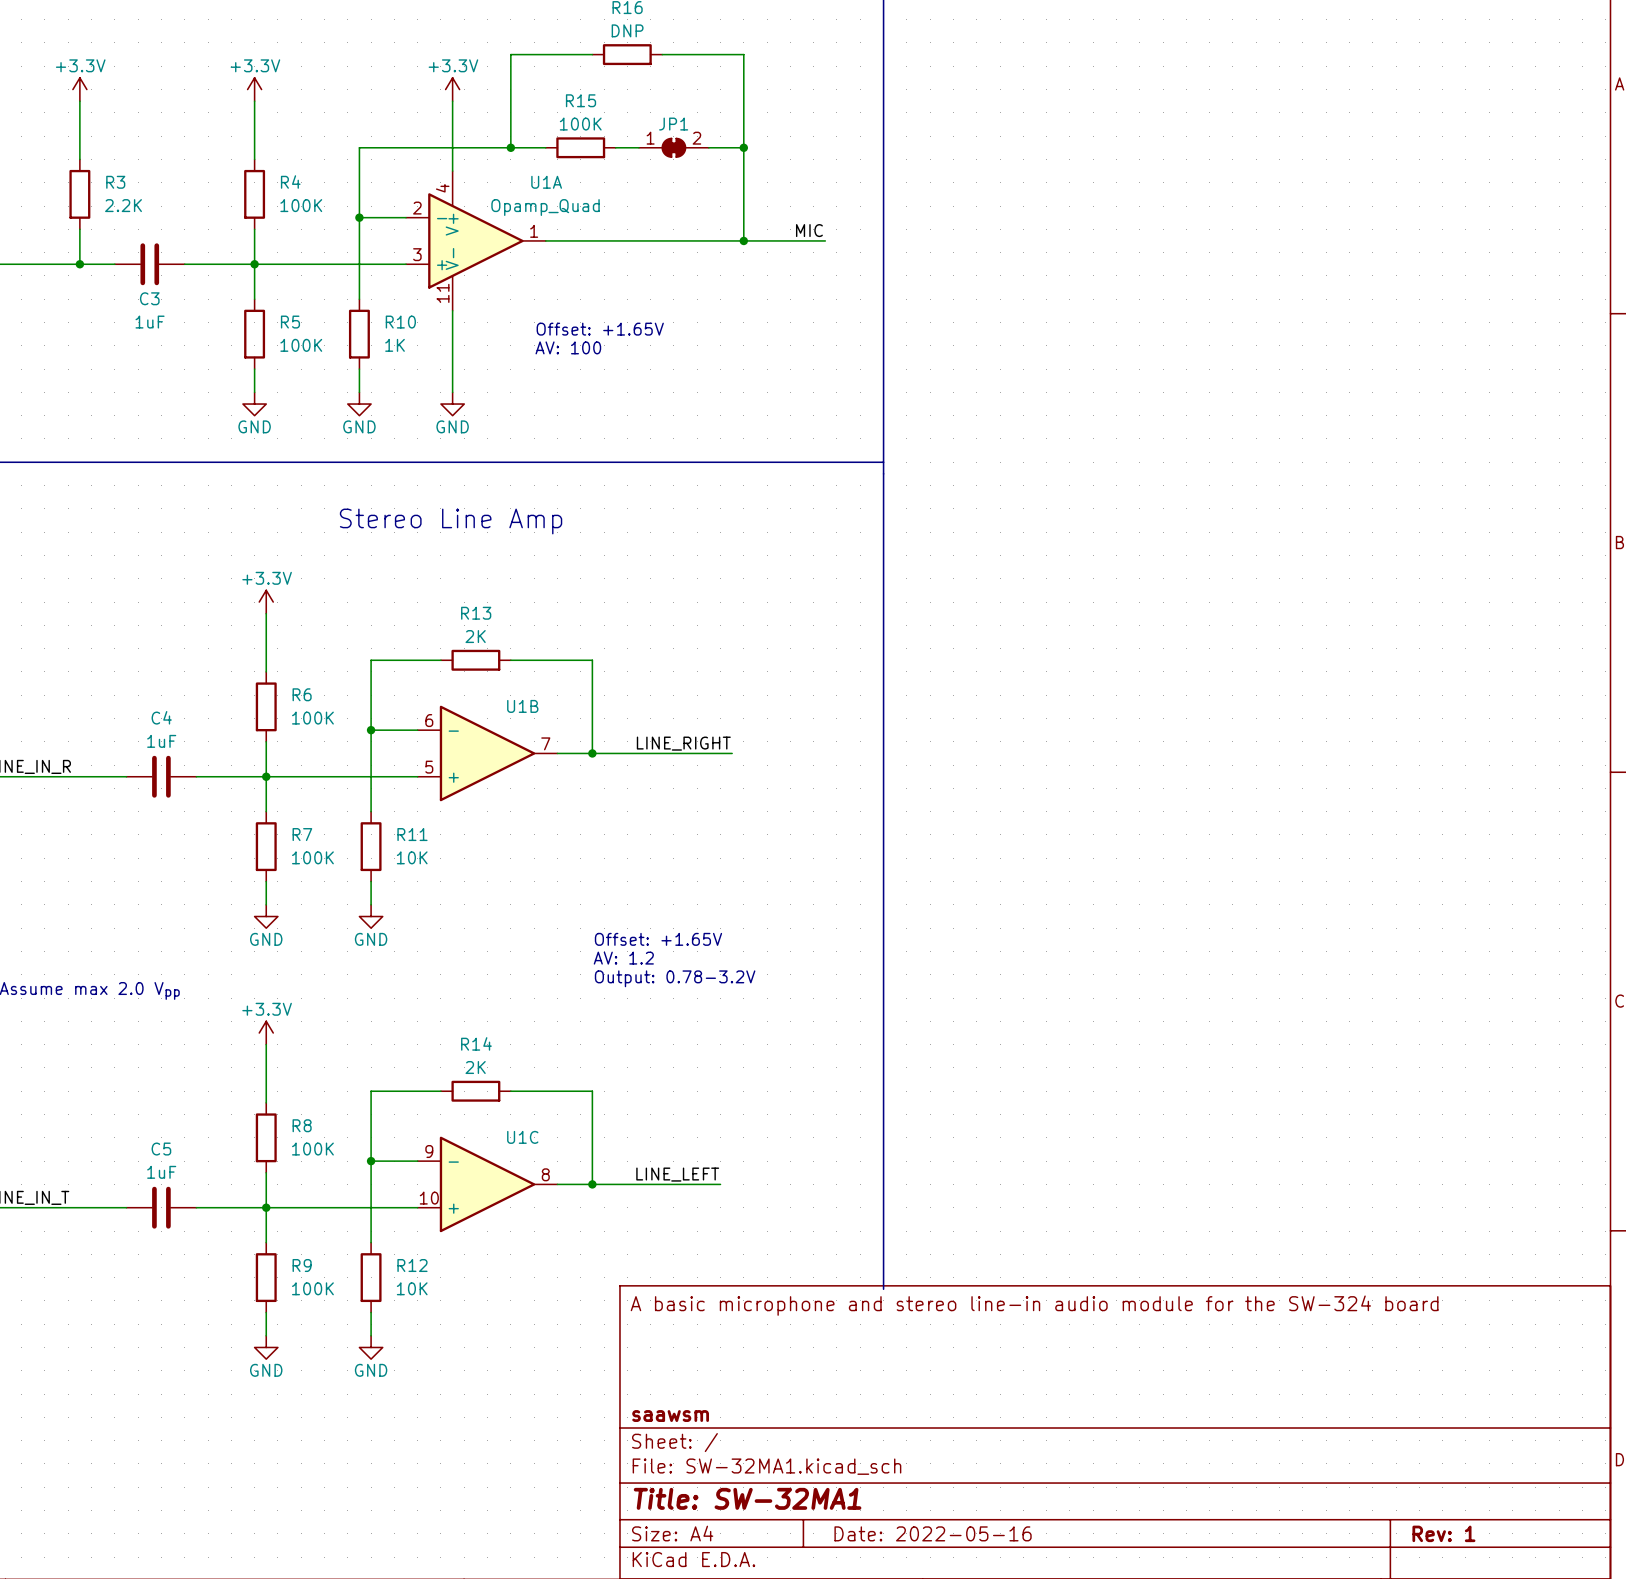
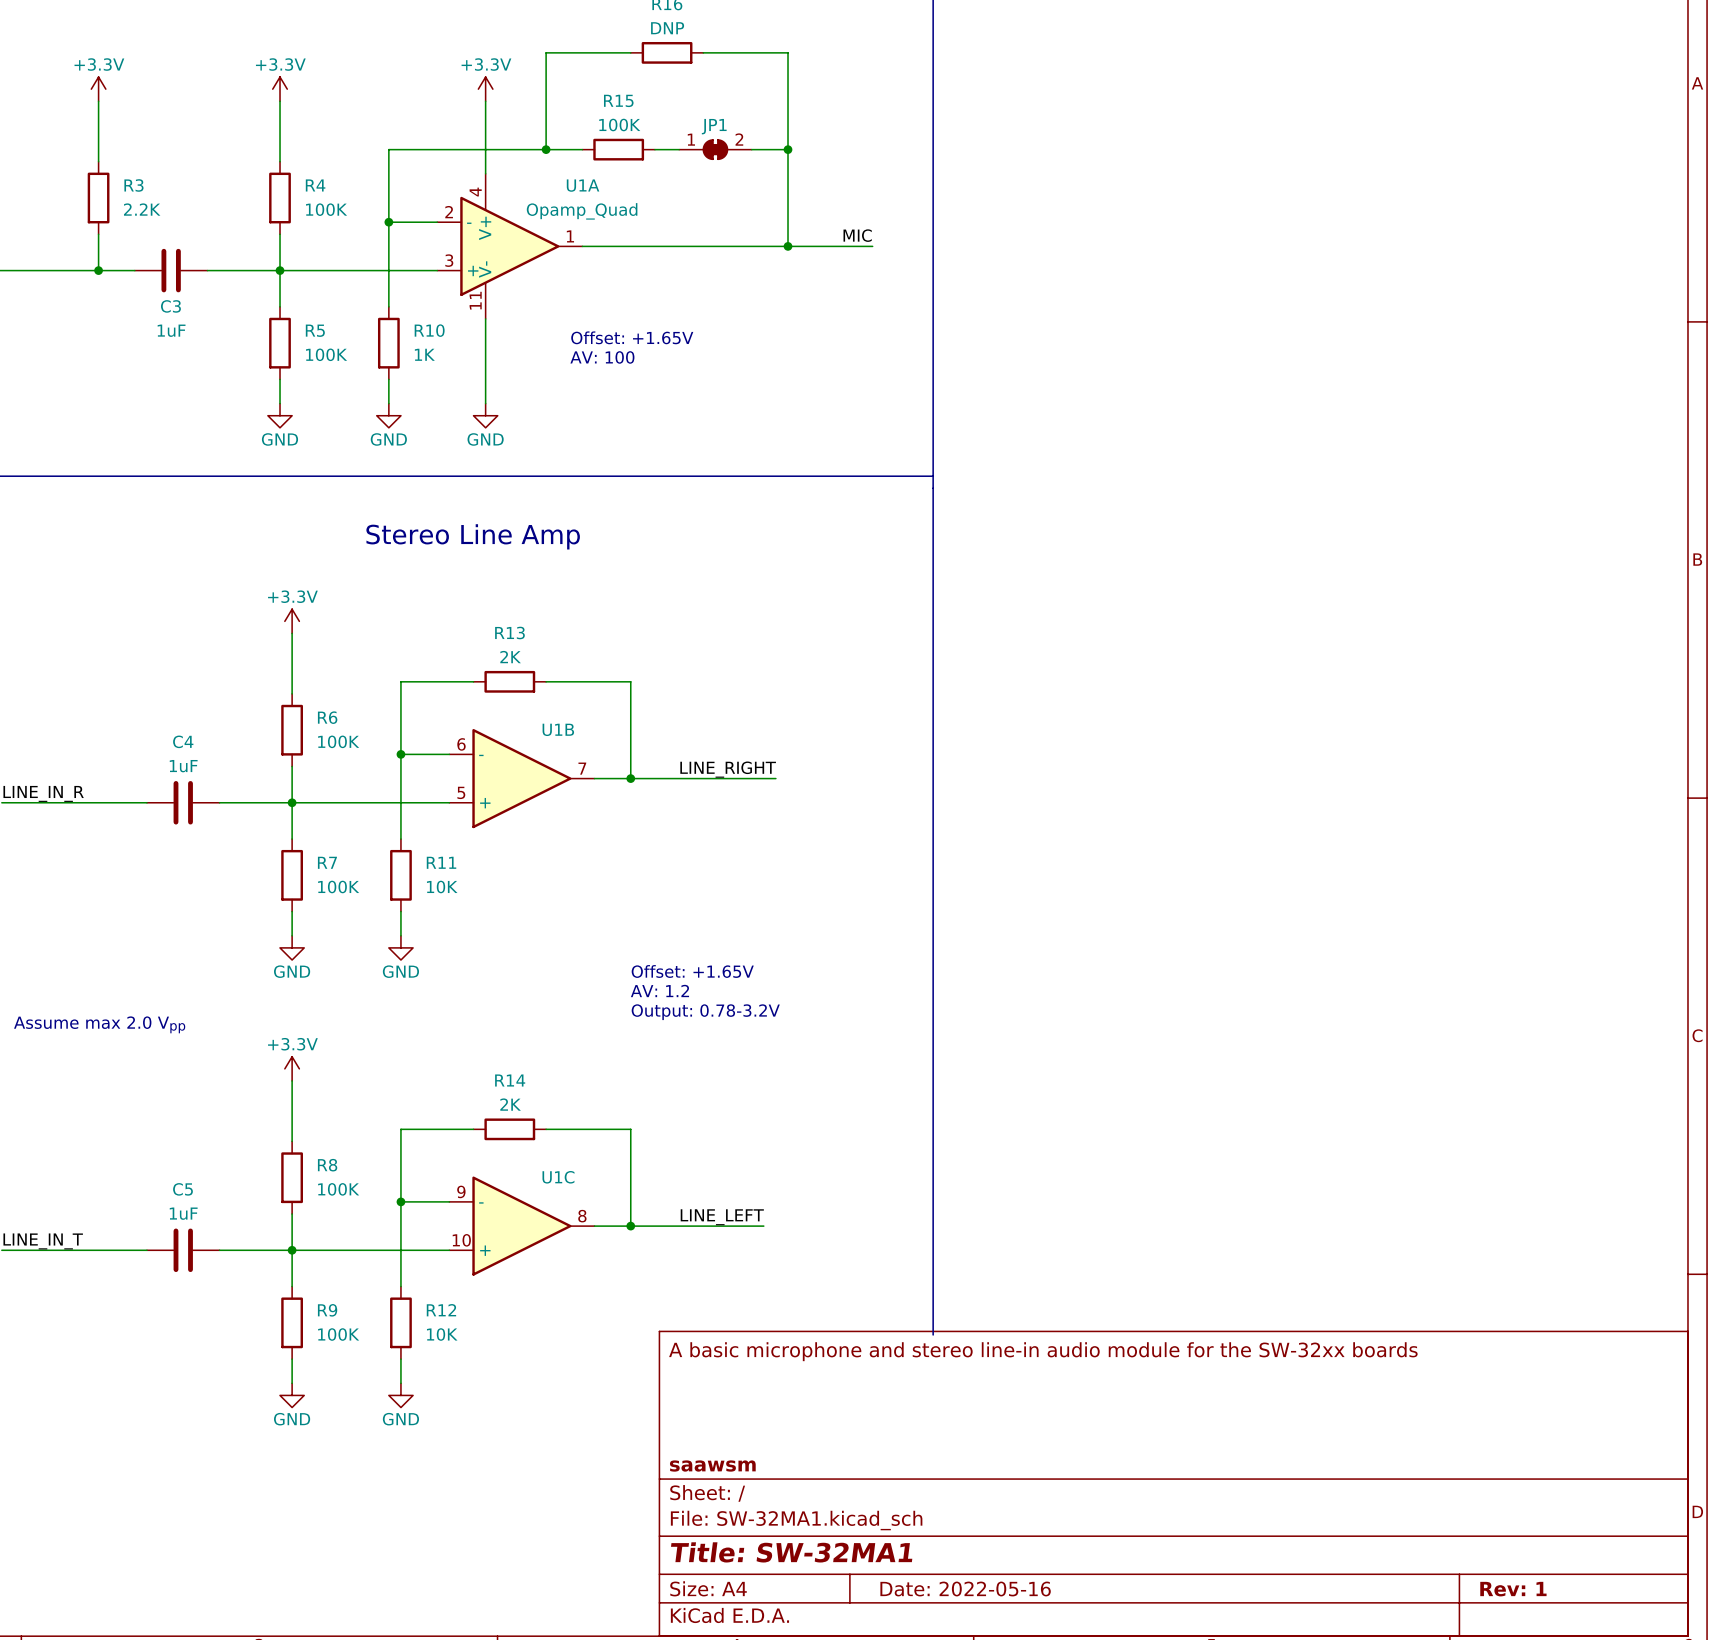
title block: A basic microphone and stereo line-in audio module for the SW-324 board (1034, 1305) -> A basic microphone and stereo line-in audio module for the SW-32xx boards (1043, 1351)

